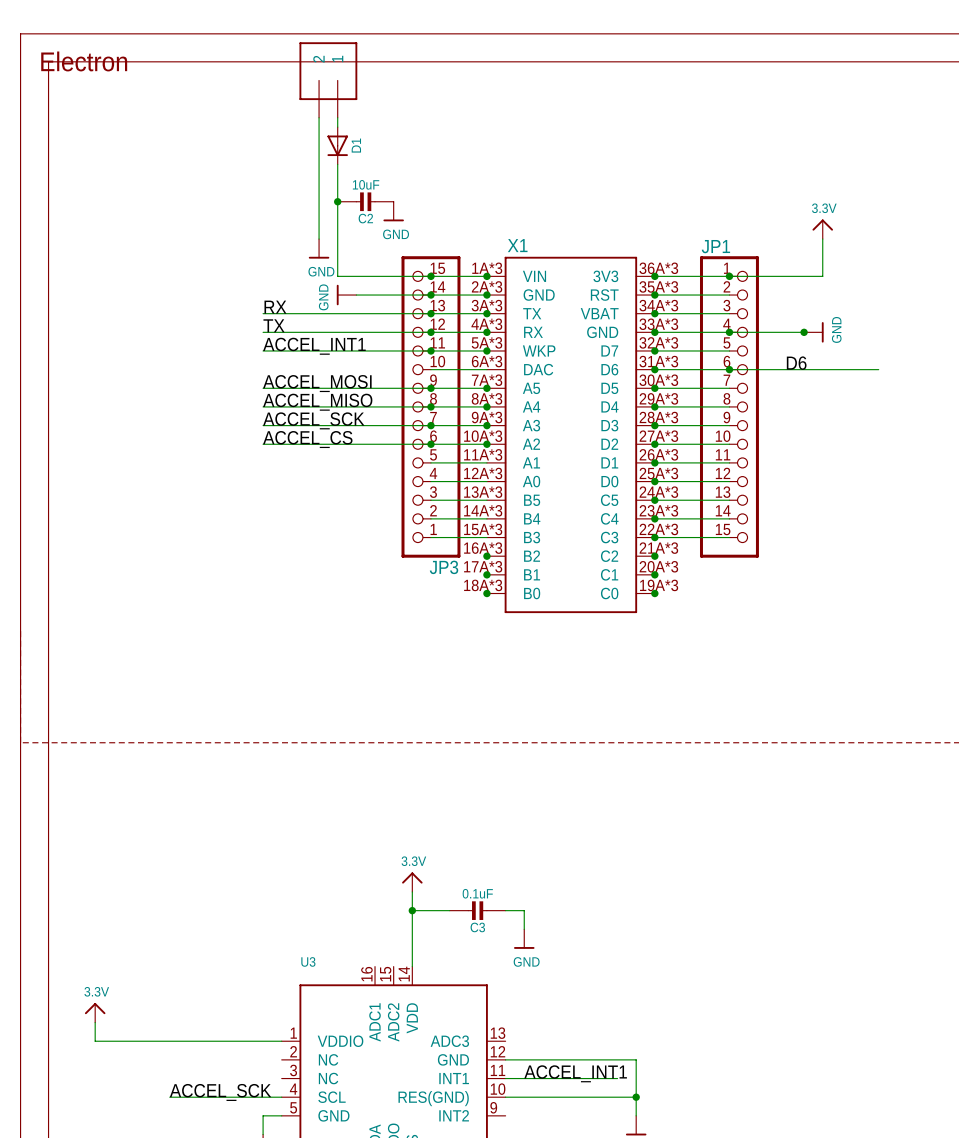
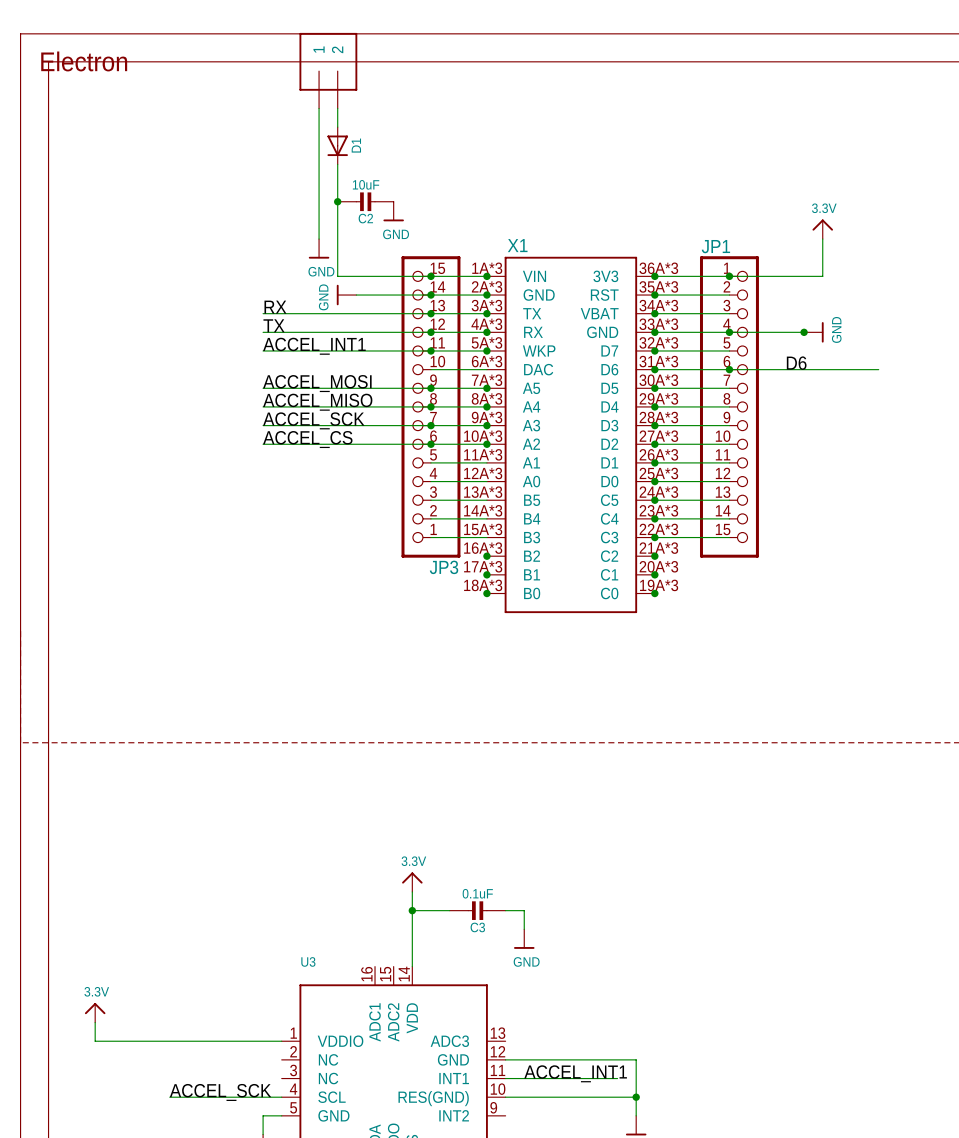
part: none -> (328, 70)
part: (328, 80) -> none

